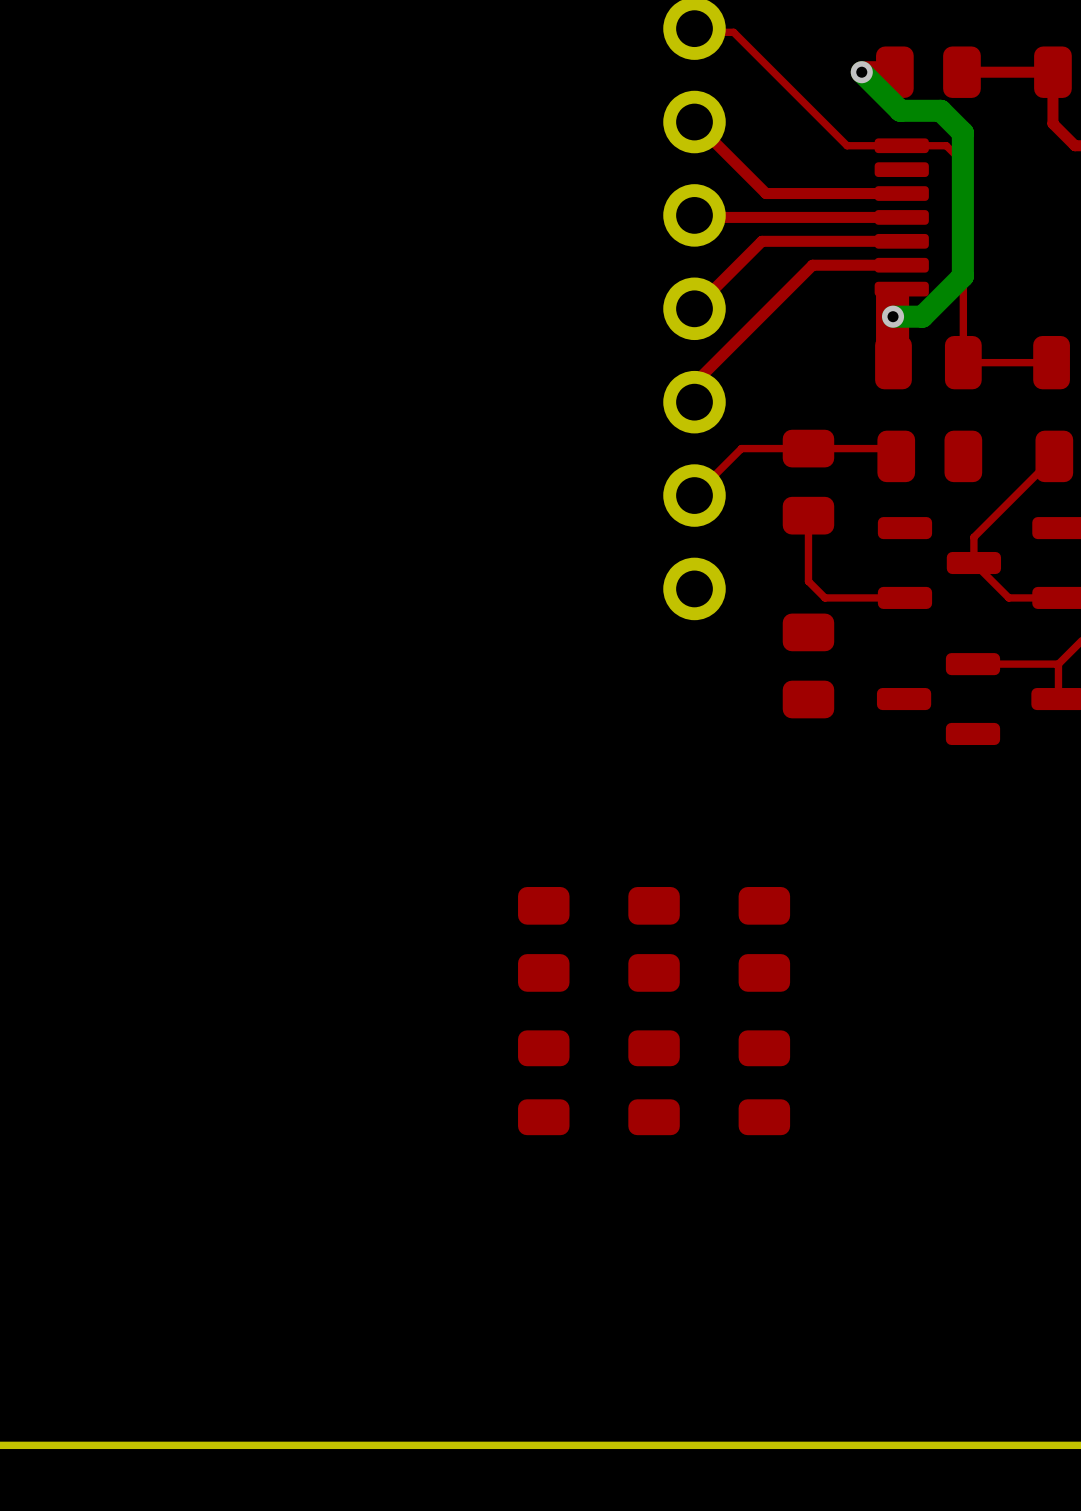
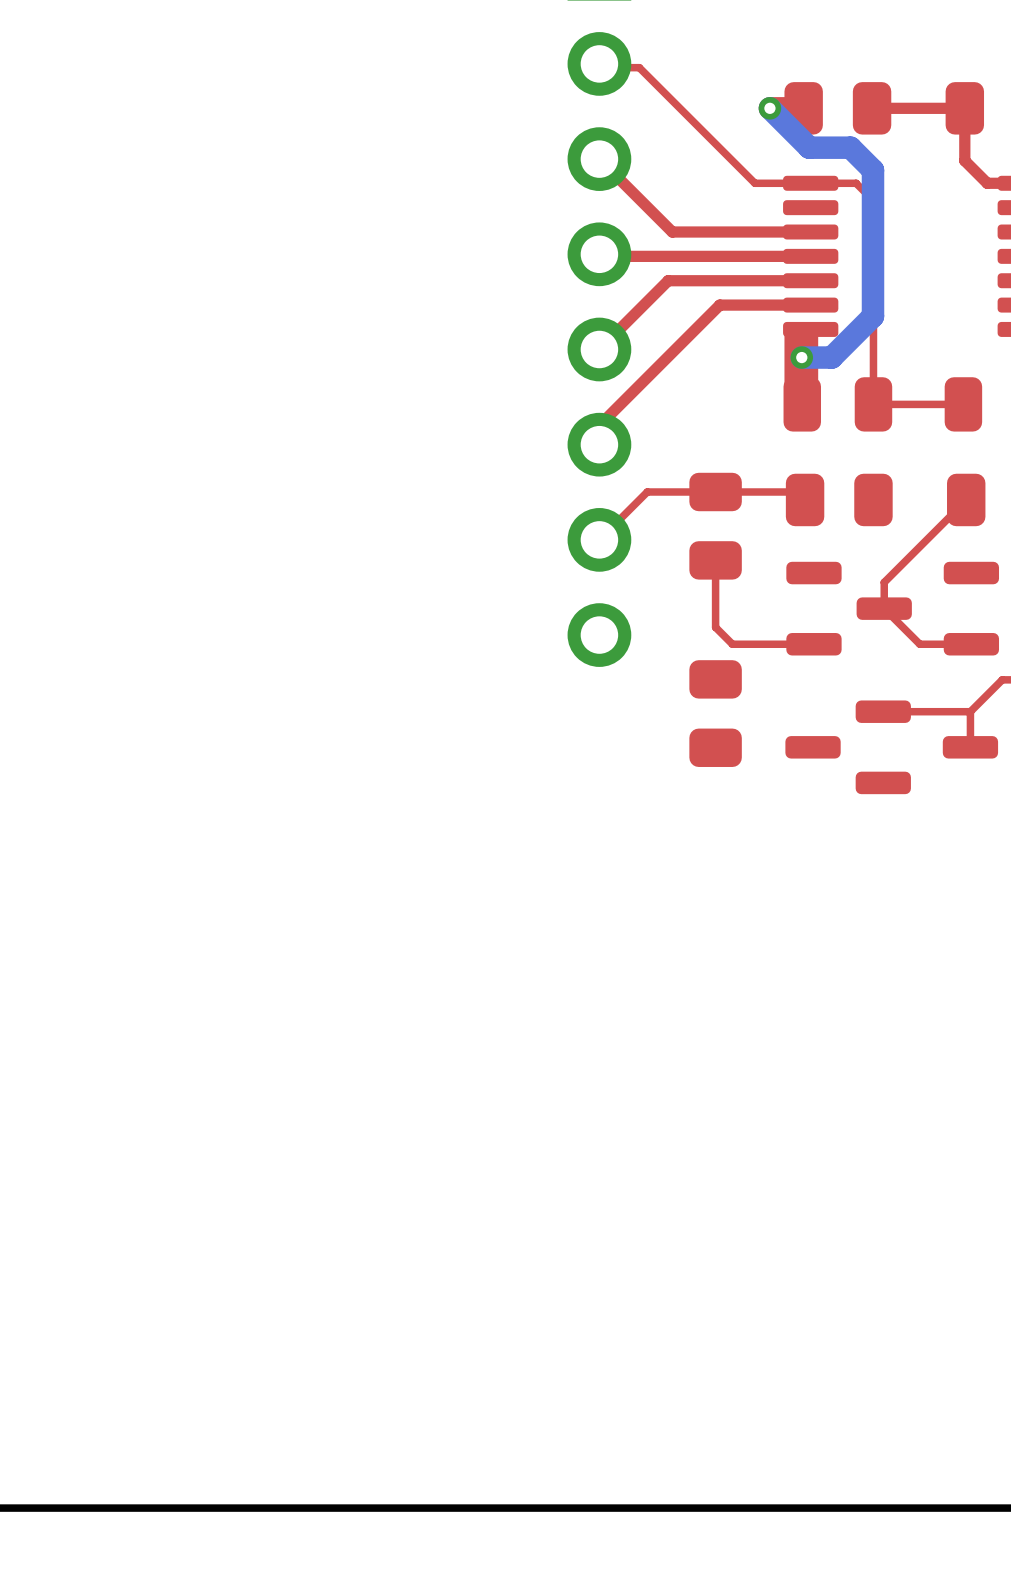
part: (543, 939) -> none
part: (654, 939) -> none
part: (764, 939) -> none
part: (543, 1082) -> none
part: (654, 1082) -> none
part: (764, 1082) -> none

